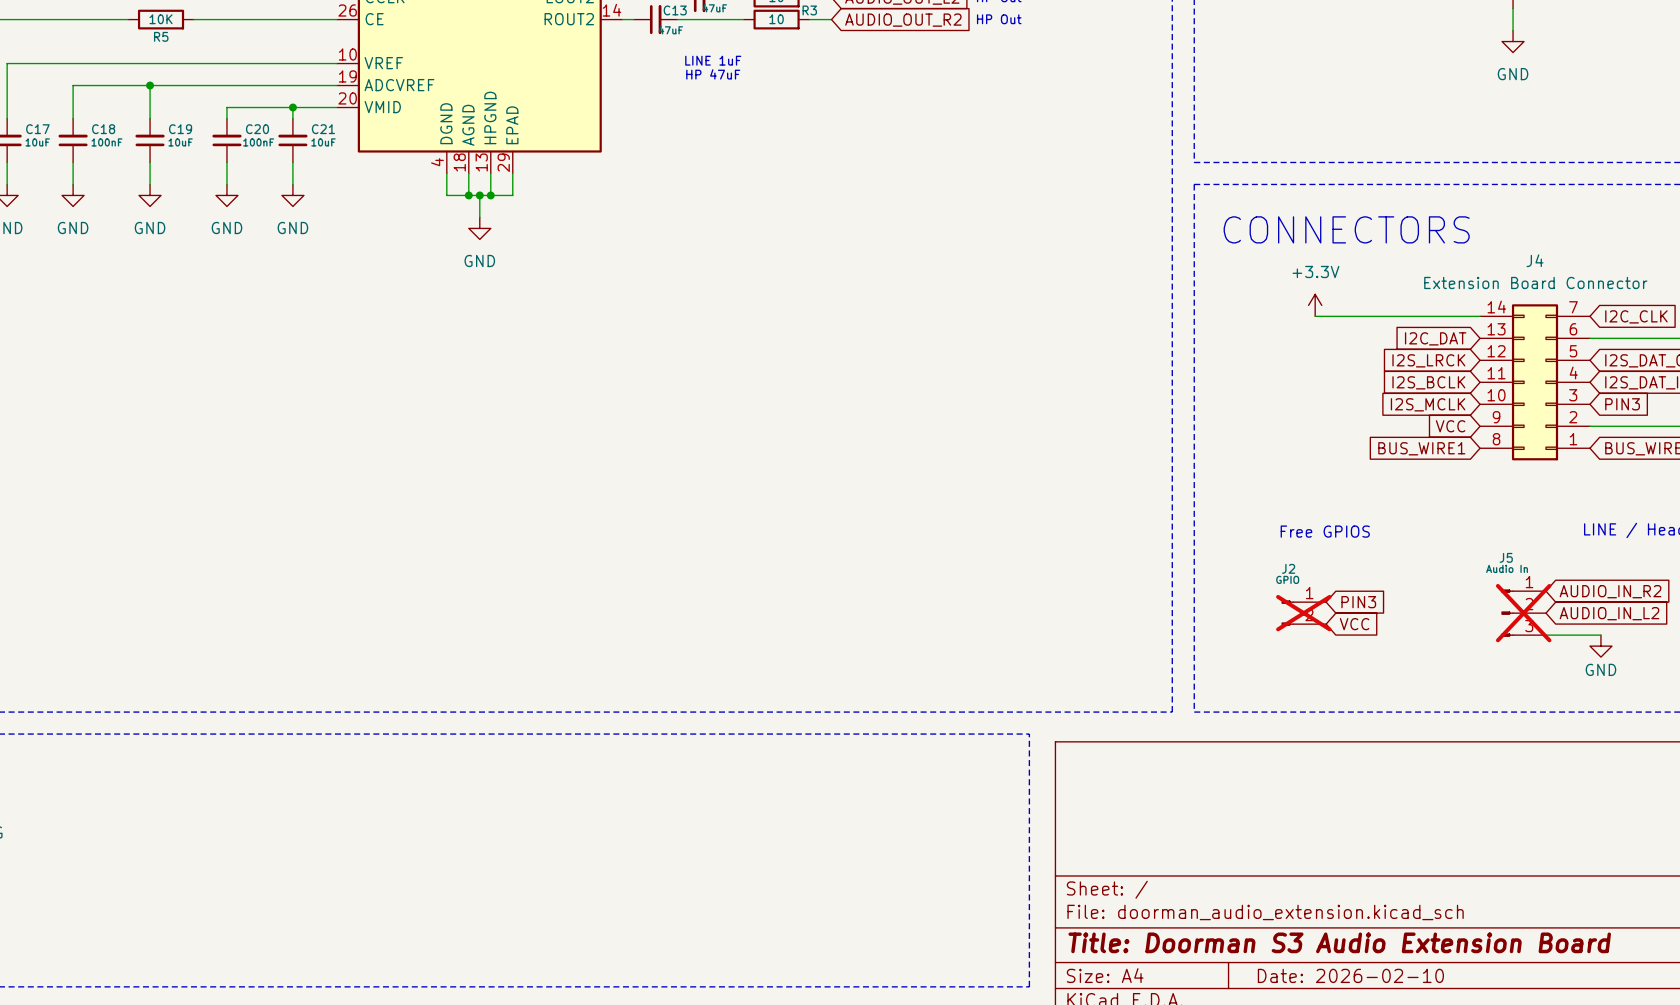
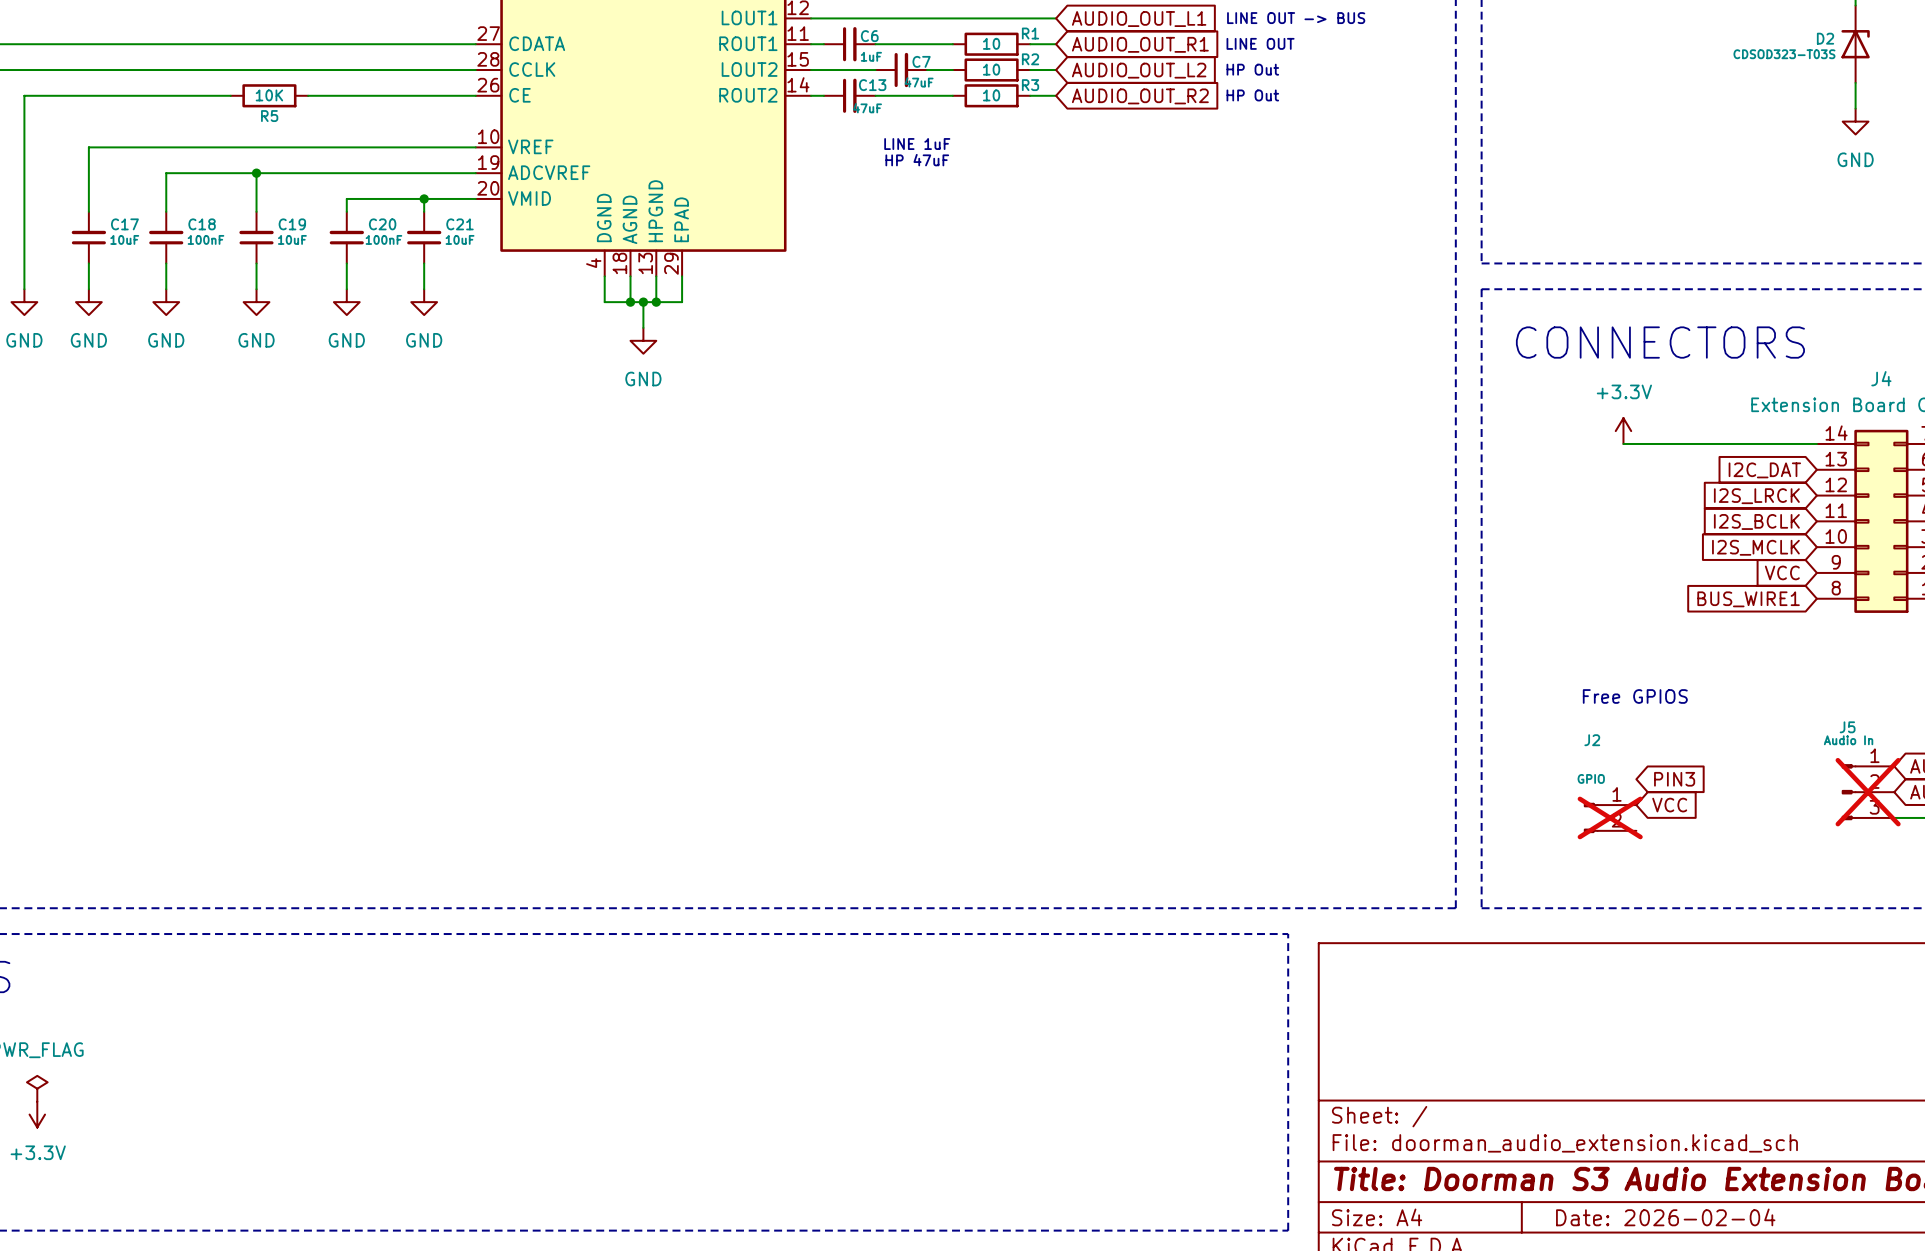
J2 position: (1303, 613) -> (1610, 817)
title block: Date: 2026-02-10 (1350, 975) -> Date: 2026-02-04 (1665, 1217)

